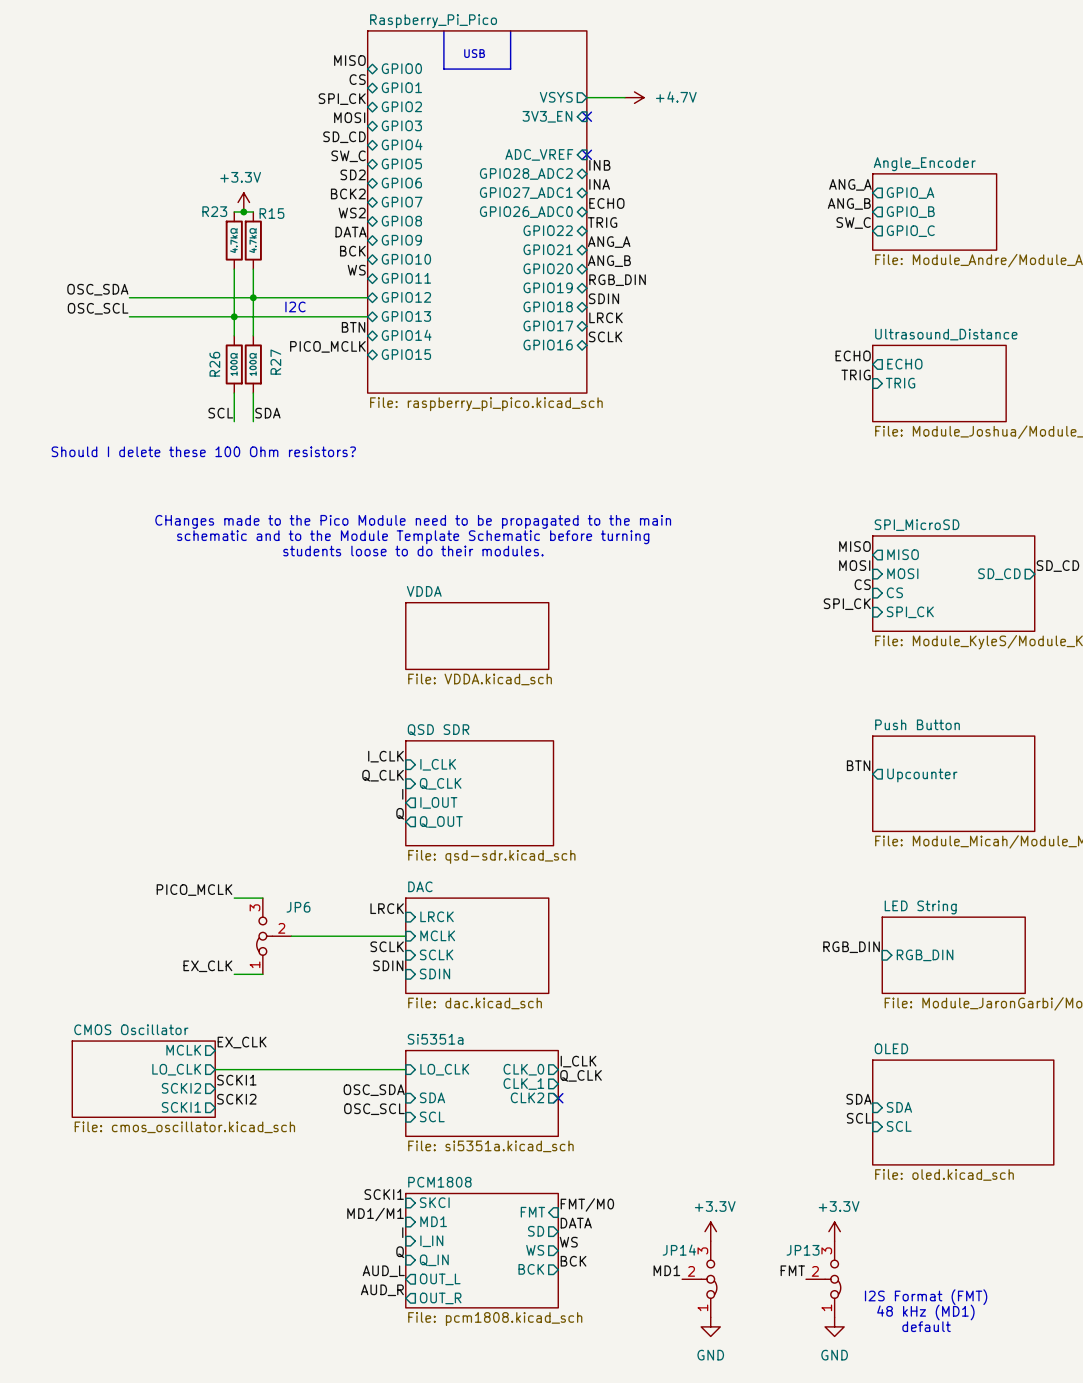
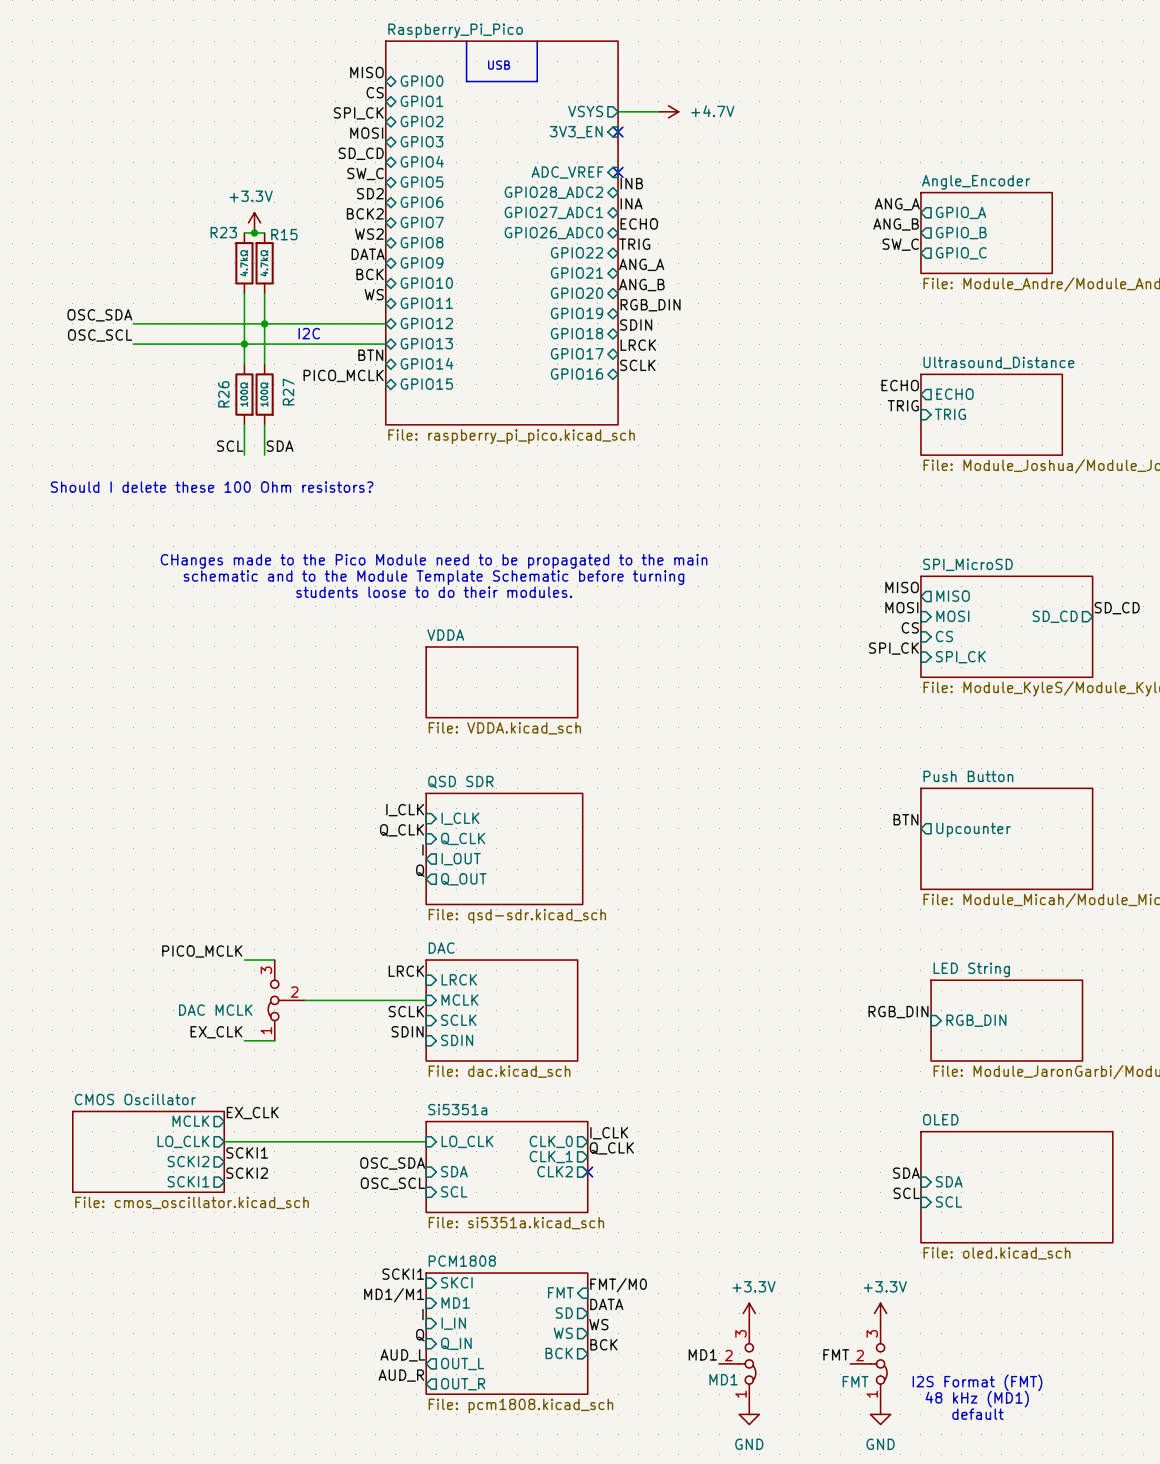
JP6 name: JP6 (298, 907) -> none
JP6 value: none -> DAC MCLK (215, 1010)
JP14 name: JP14 (679, 1250) -> none
JP13 name: JP13 (803, 1250) -> none
JP14 value: none -> MD1 (723, 1379)
JP13 value: none -> FMT (855, 1381)

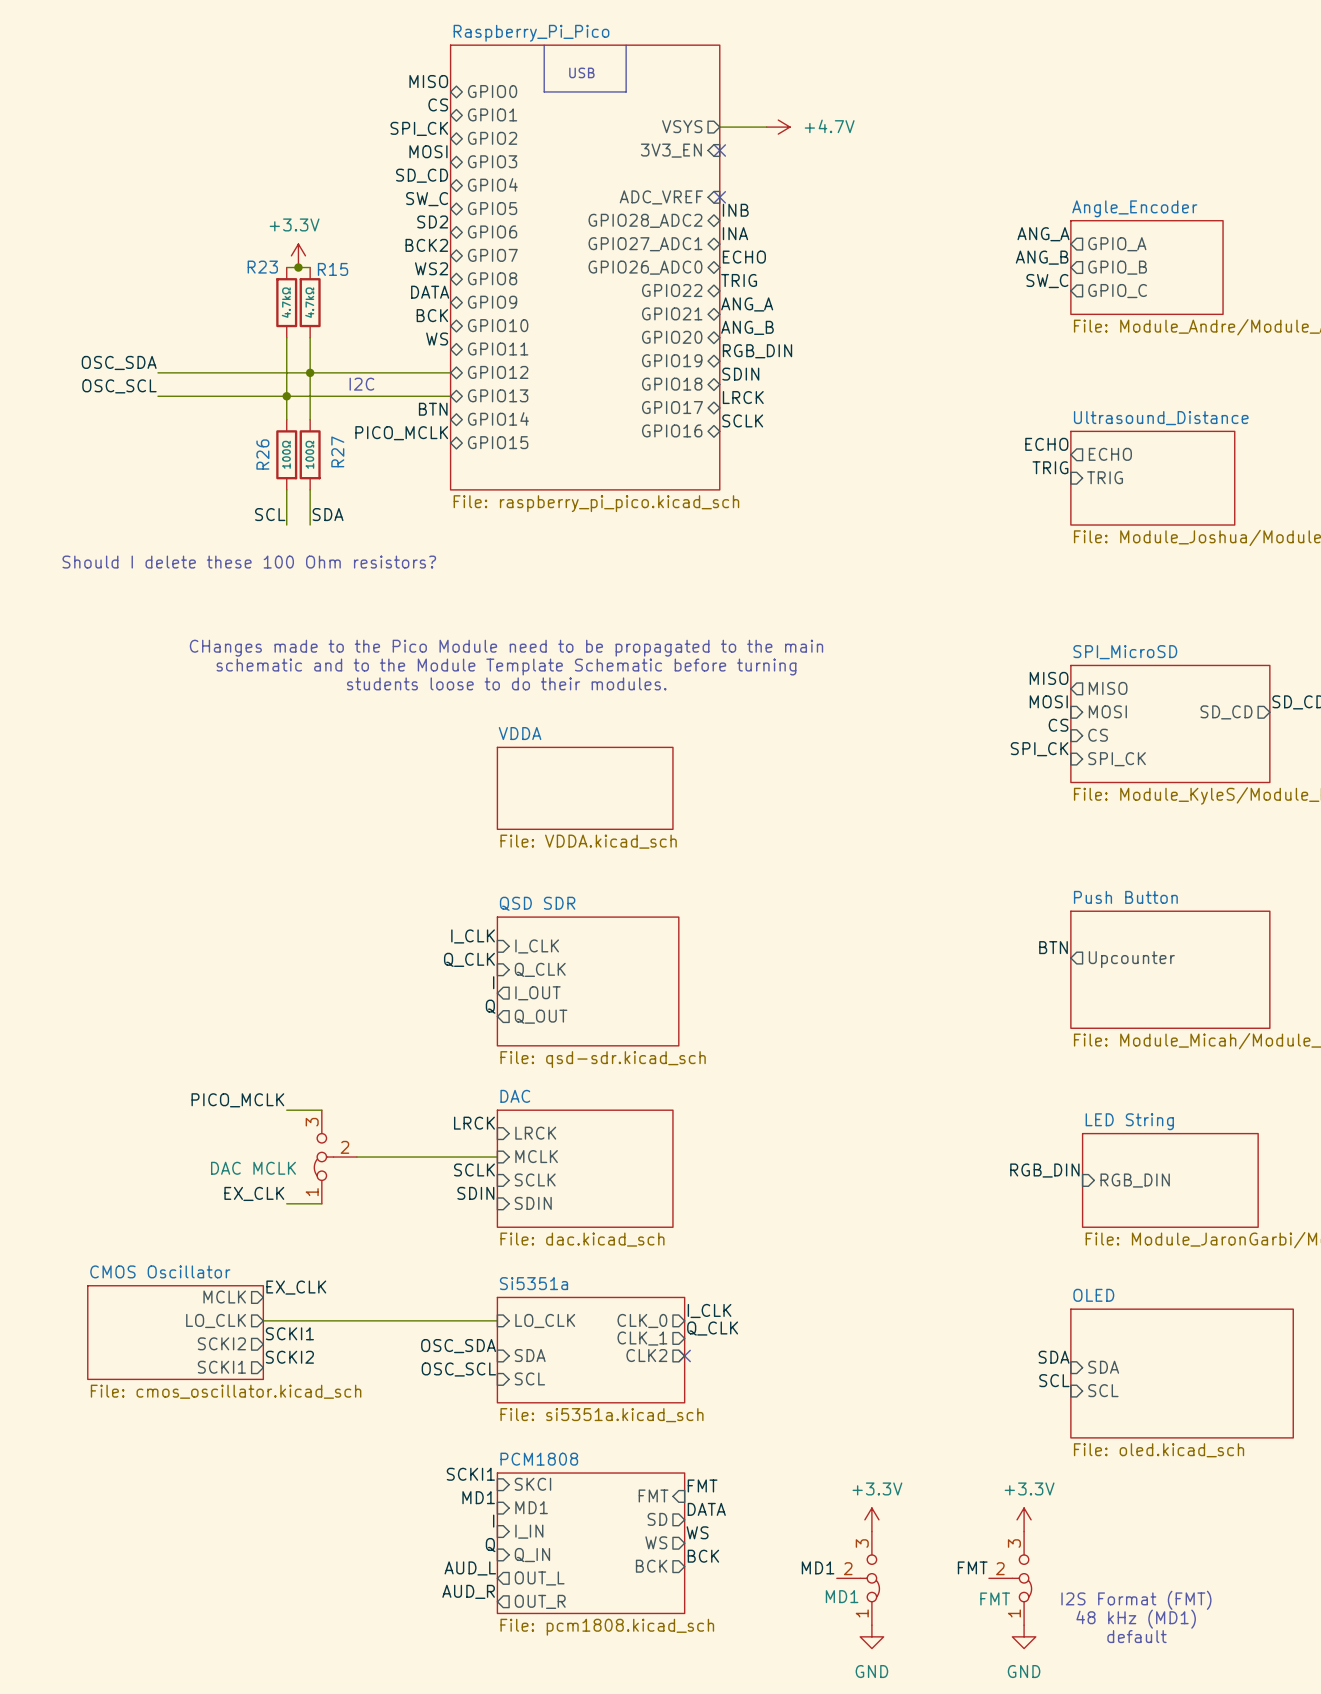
label: FMT/M0 (618, 1285) -> FMT (702, 1485)
label: MD1/M1 (394, 1295) -> MD1 (478, 1497)

